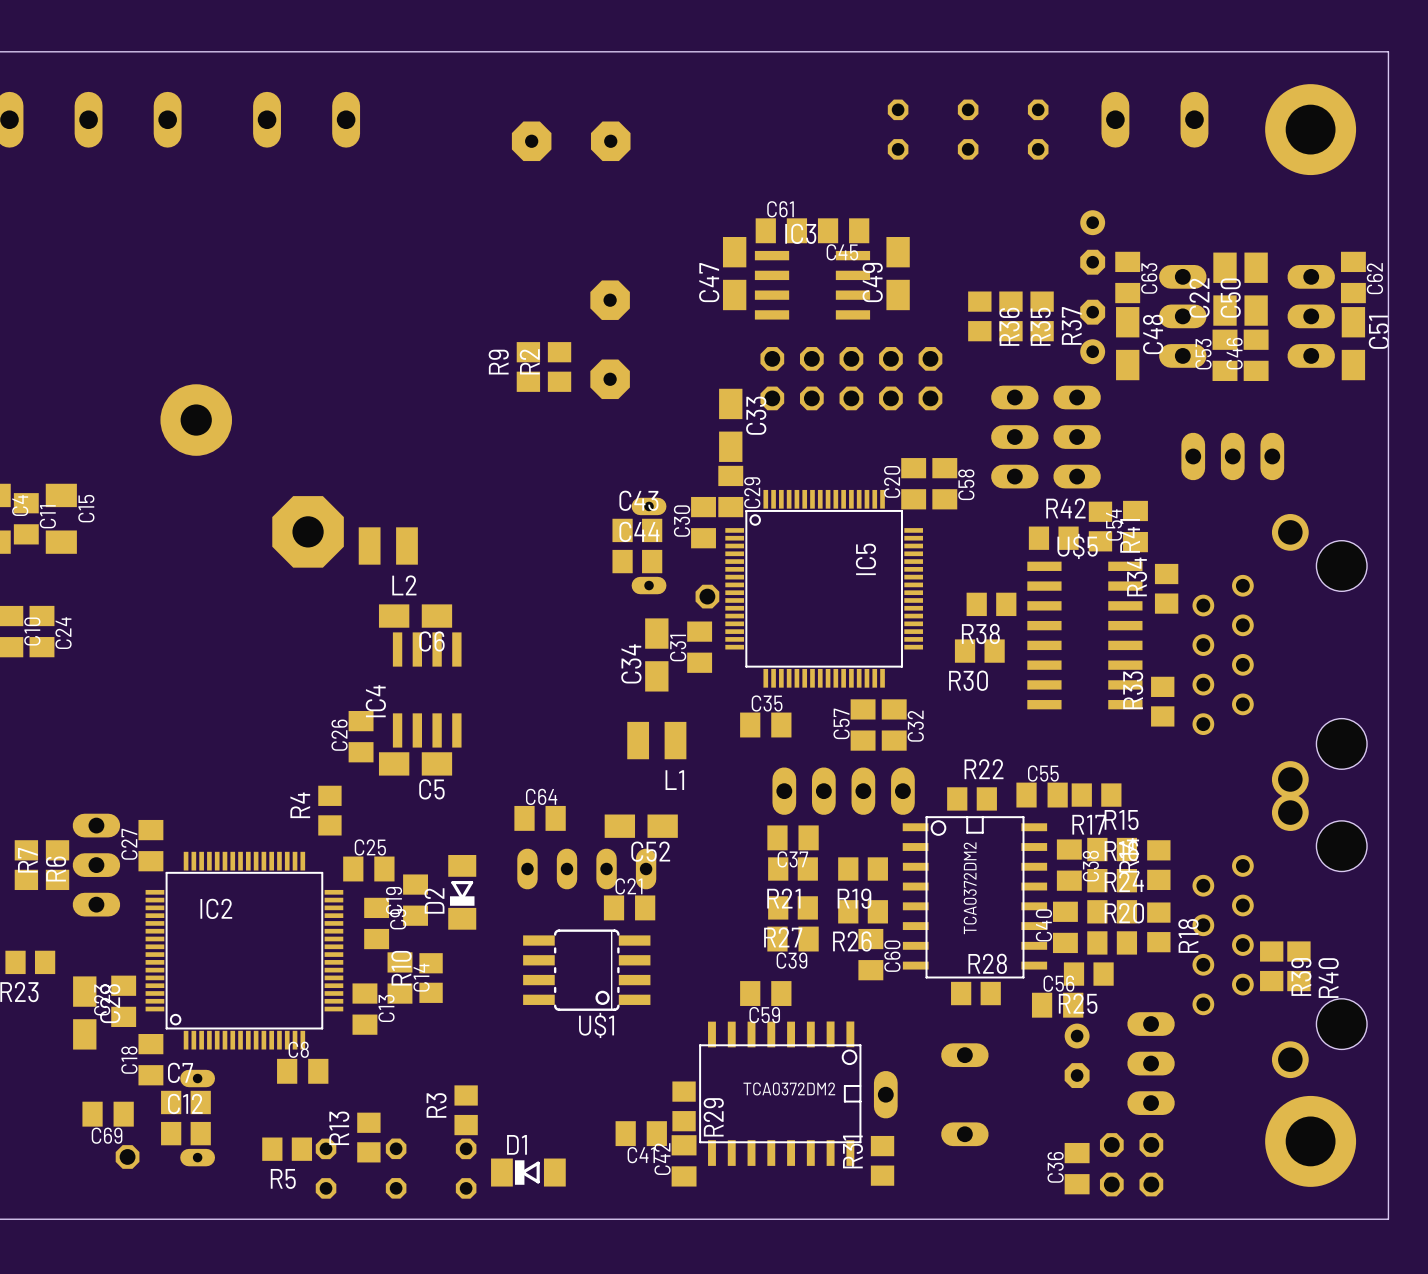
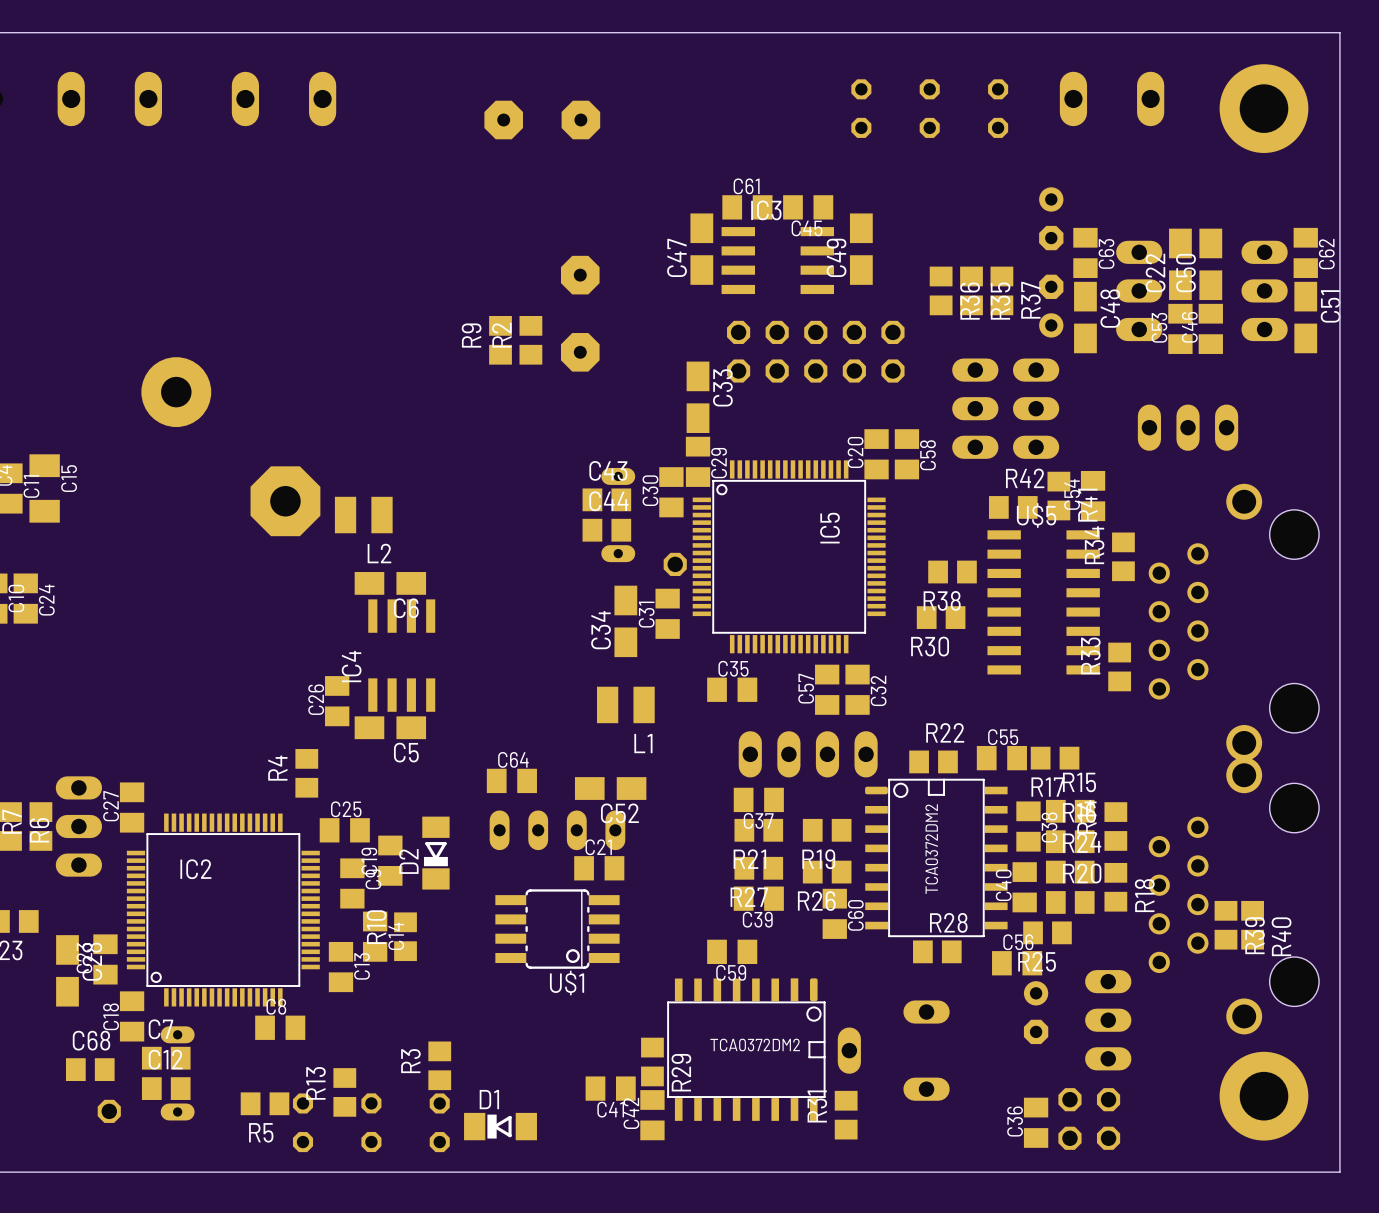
part footprint: [902, 816, 1048, 979] -> [865, 778, 1008, 938]
part footprint: [699, 1021, 862, 1166] -> [667, 978, 826, 1121]
C69: (108, 1114) -> none
C68: none -> (90, 1069)

